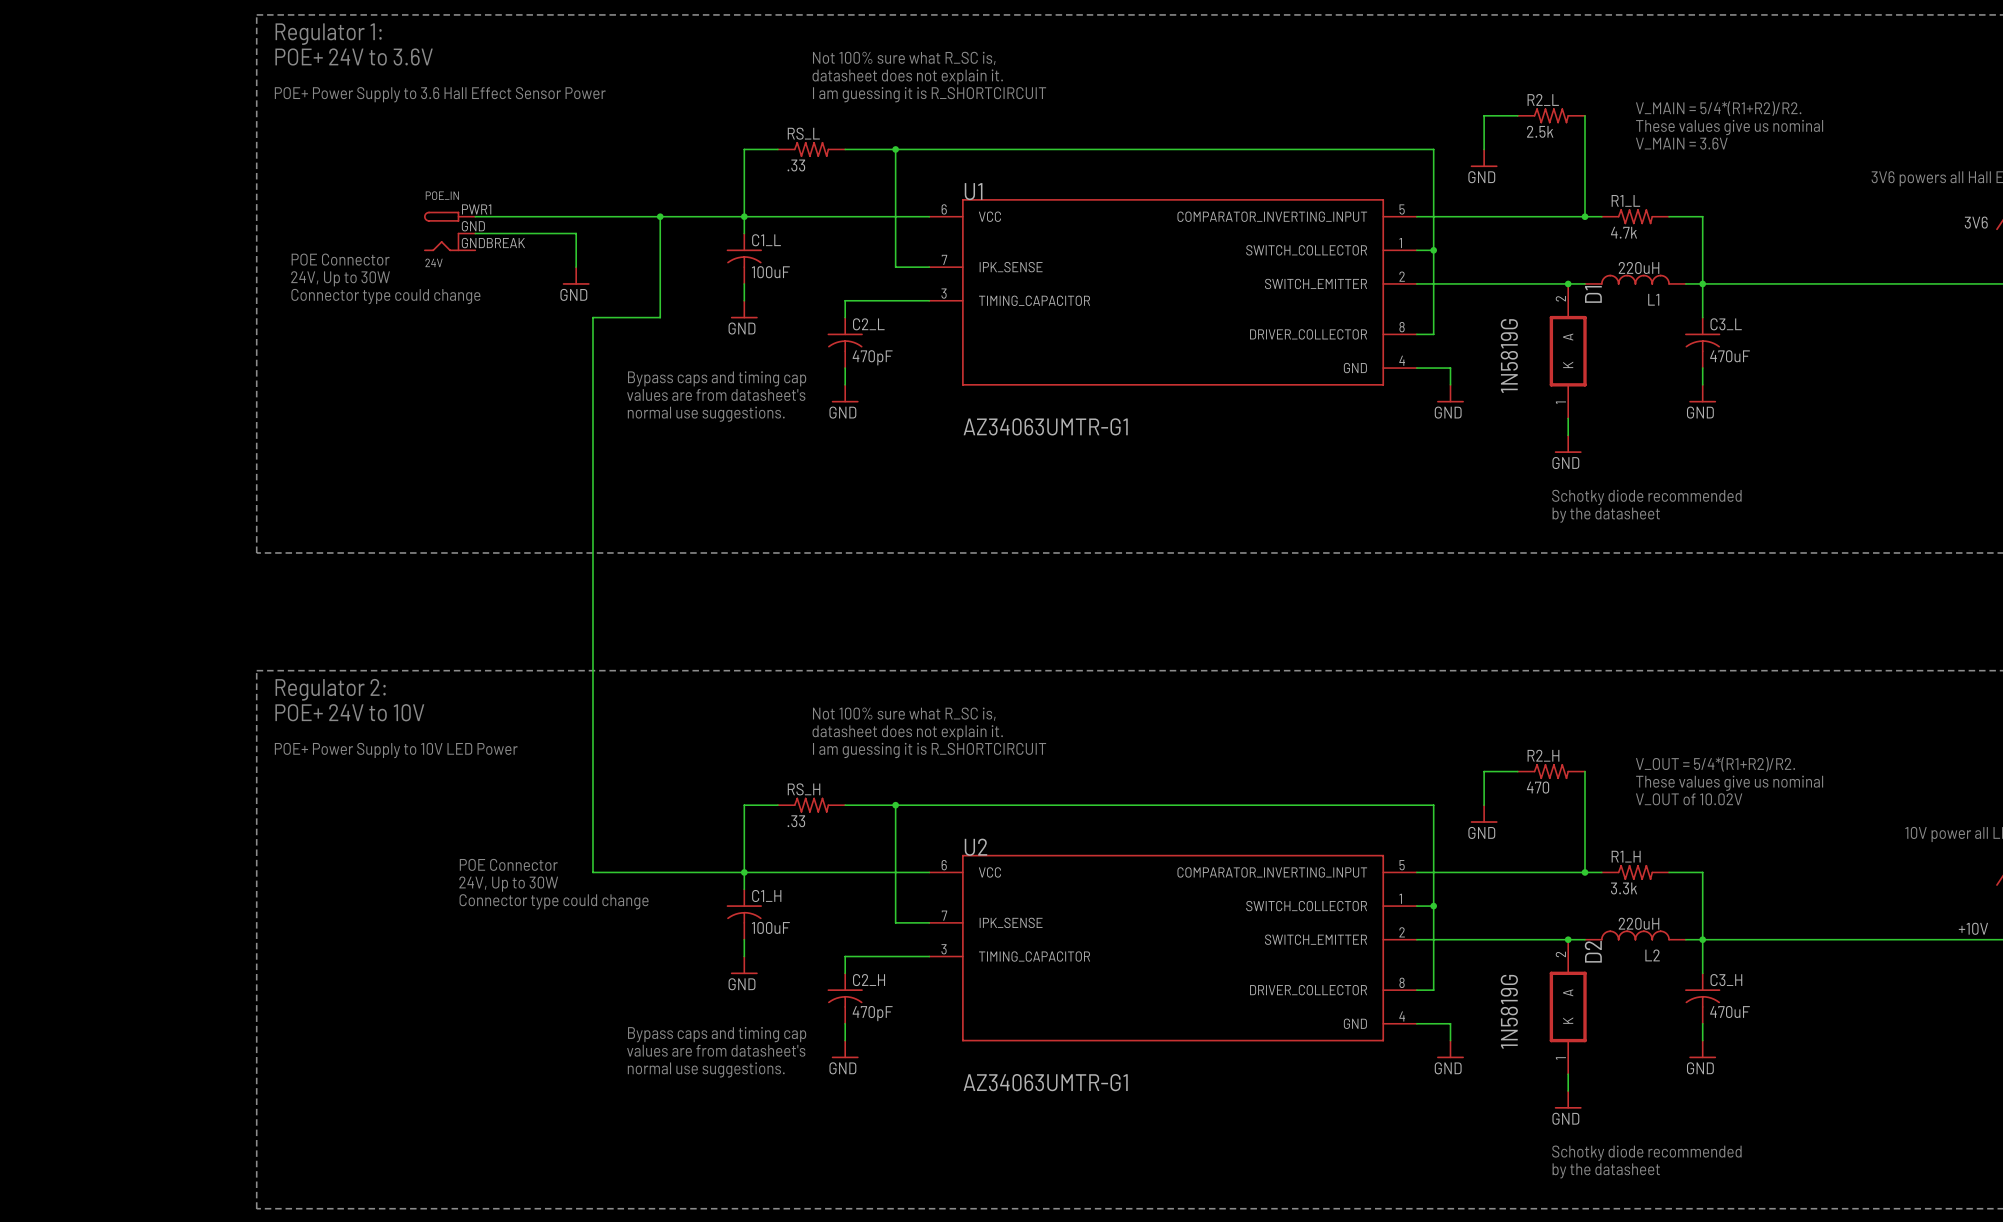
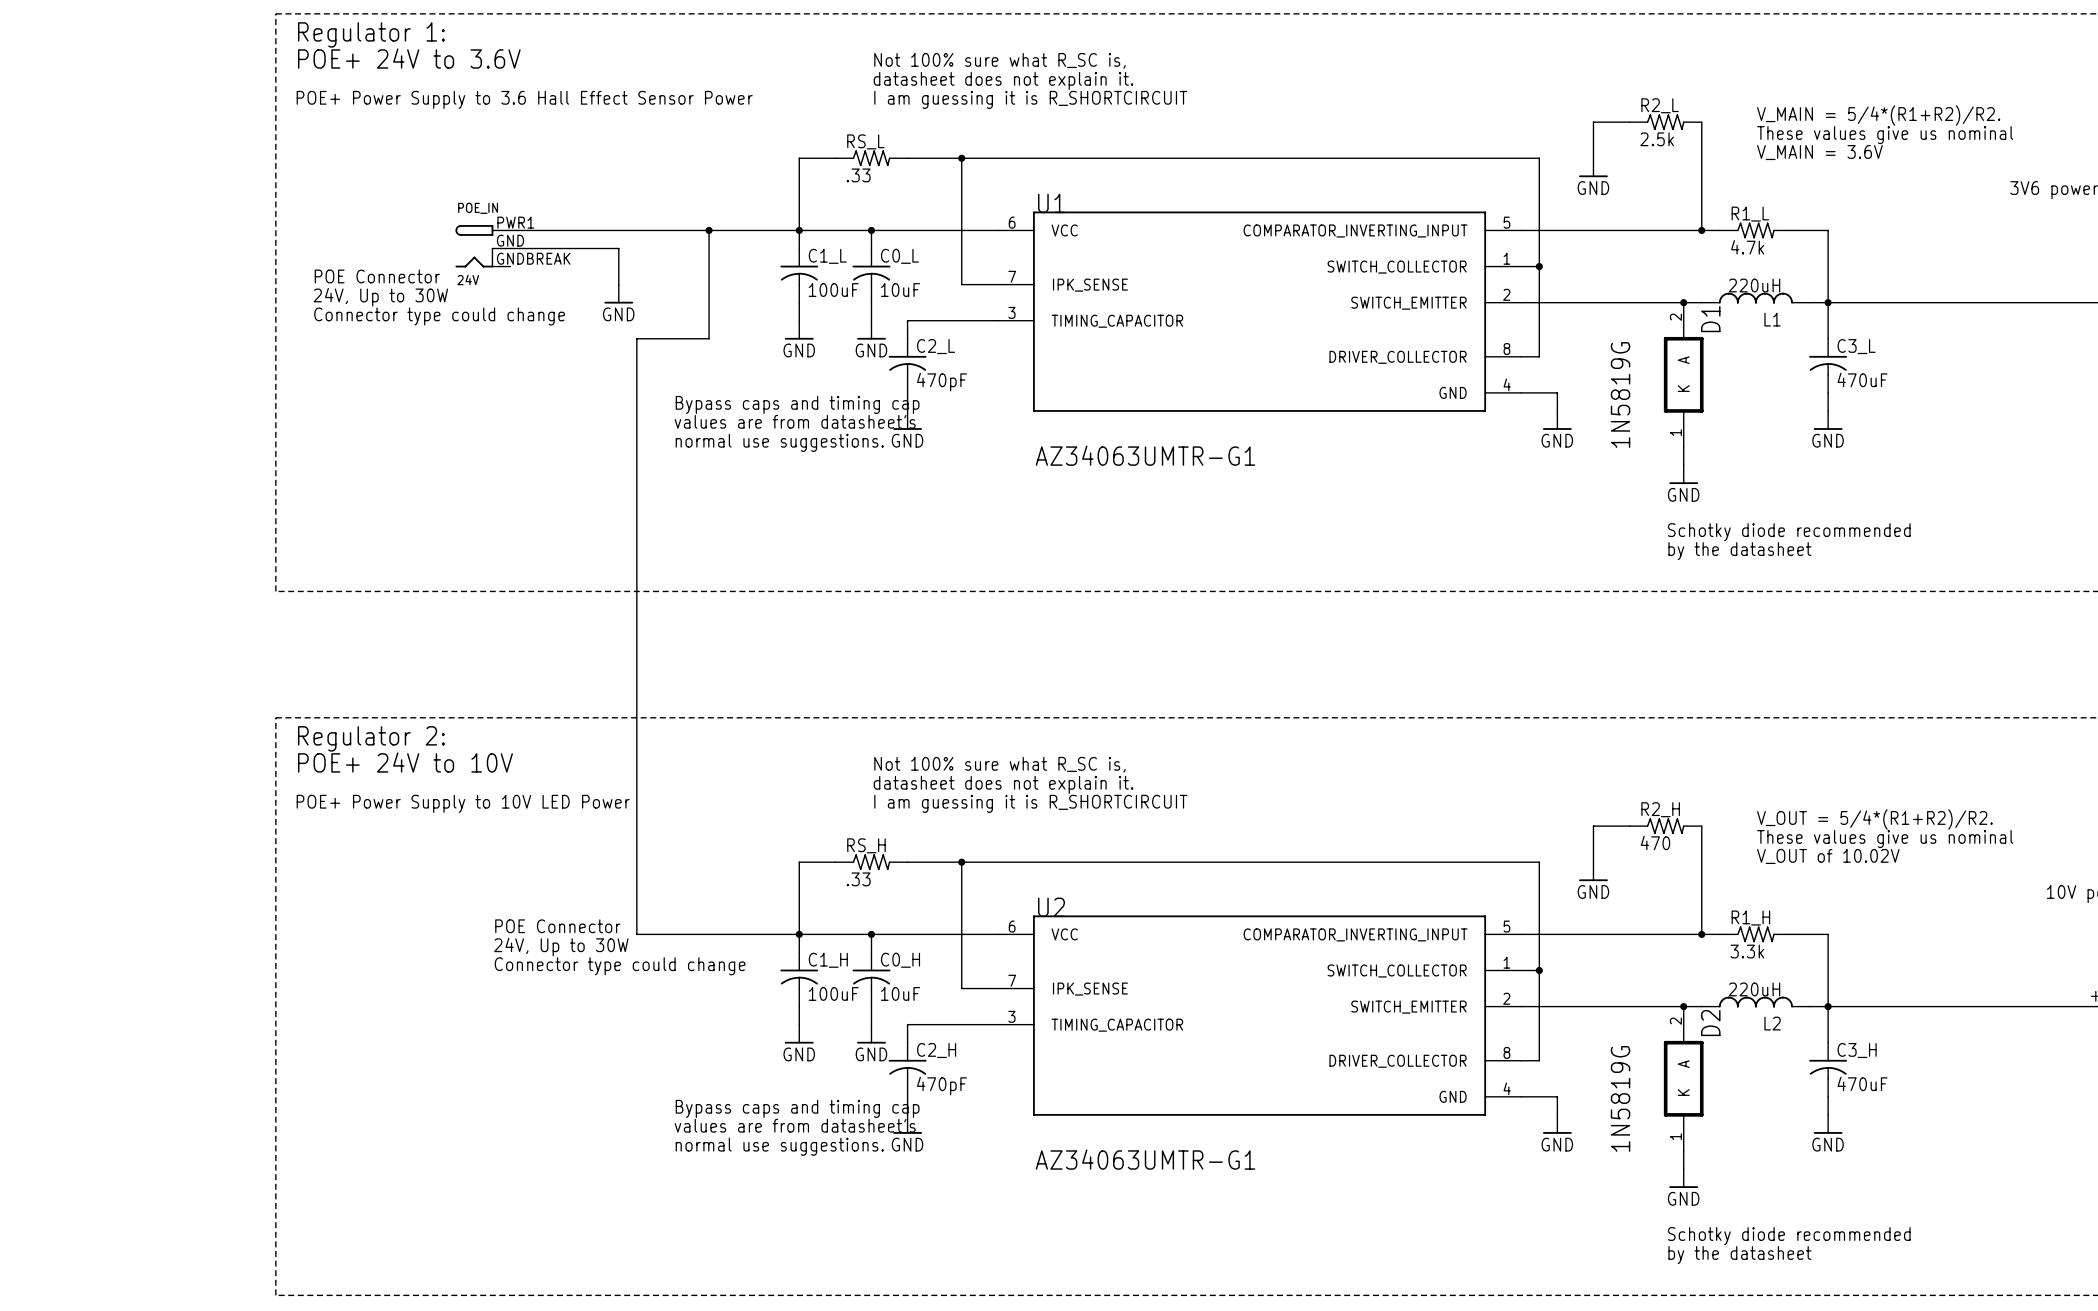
wire: none -> (871, 230) (871, 248)
junction: none -> (871, 230)
C0_L: none -> 10uF (871, 275)
wire: none -> (871, 302) (871, 320)
power symbol: none -> GND (871, 330)
wire: none -> (871, 934) (871, 952)
junction: none -> (871, 934)
C0_H: none -> 10uF (871, 979)
wire: none -> (871, 1006) (871, 1024)
power symbol: none -> GND (871, 1034)

